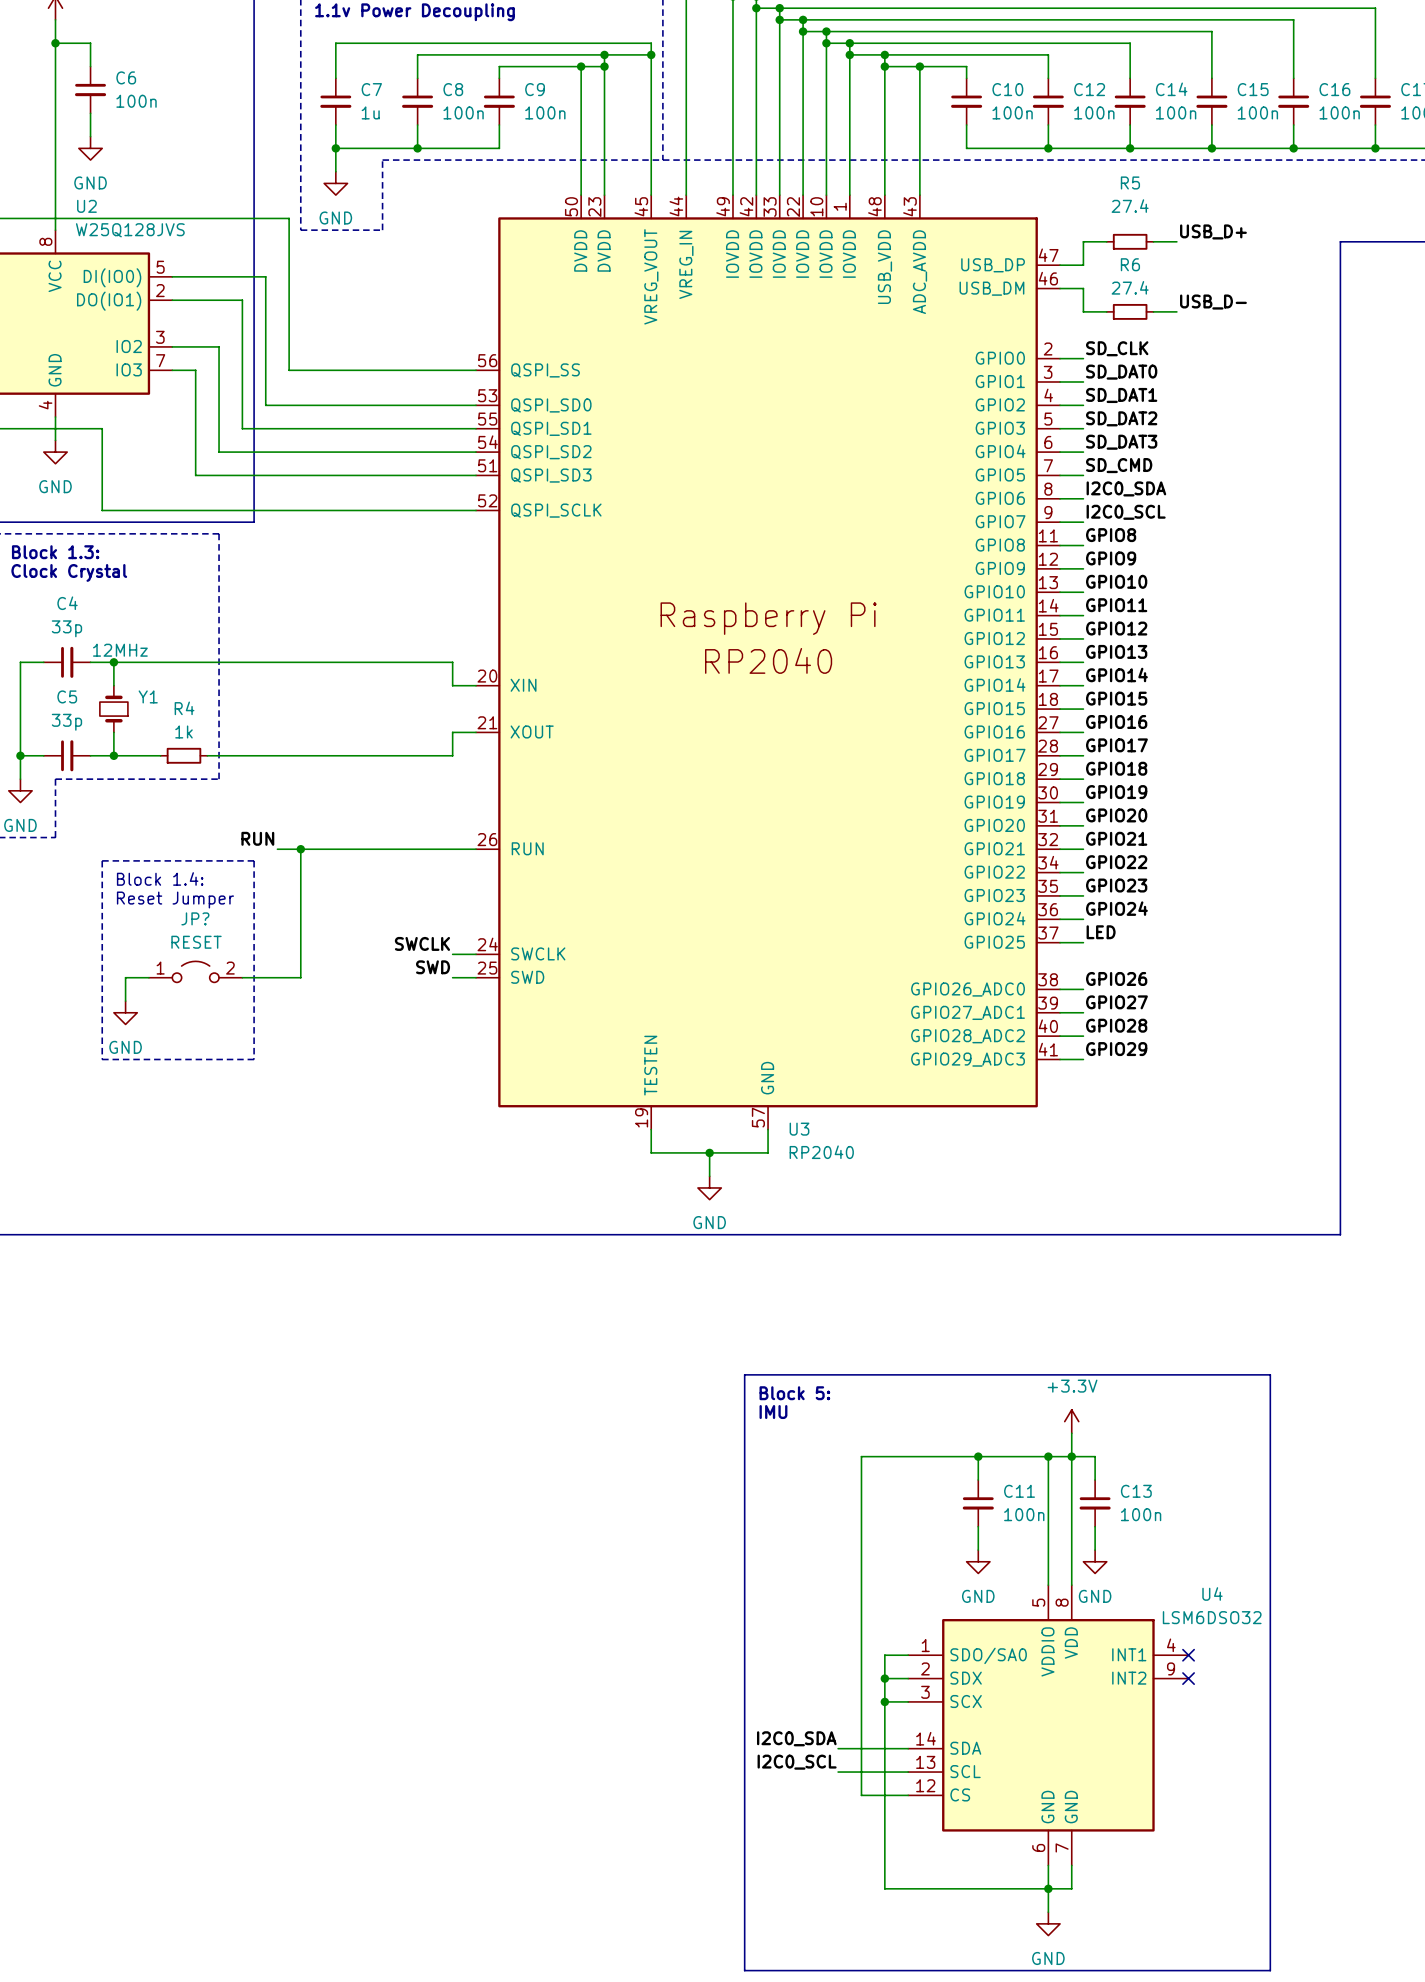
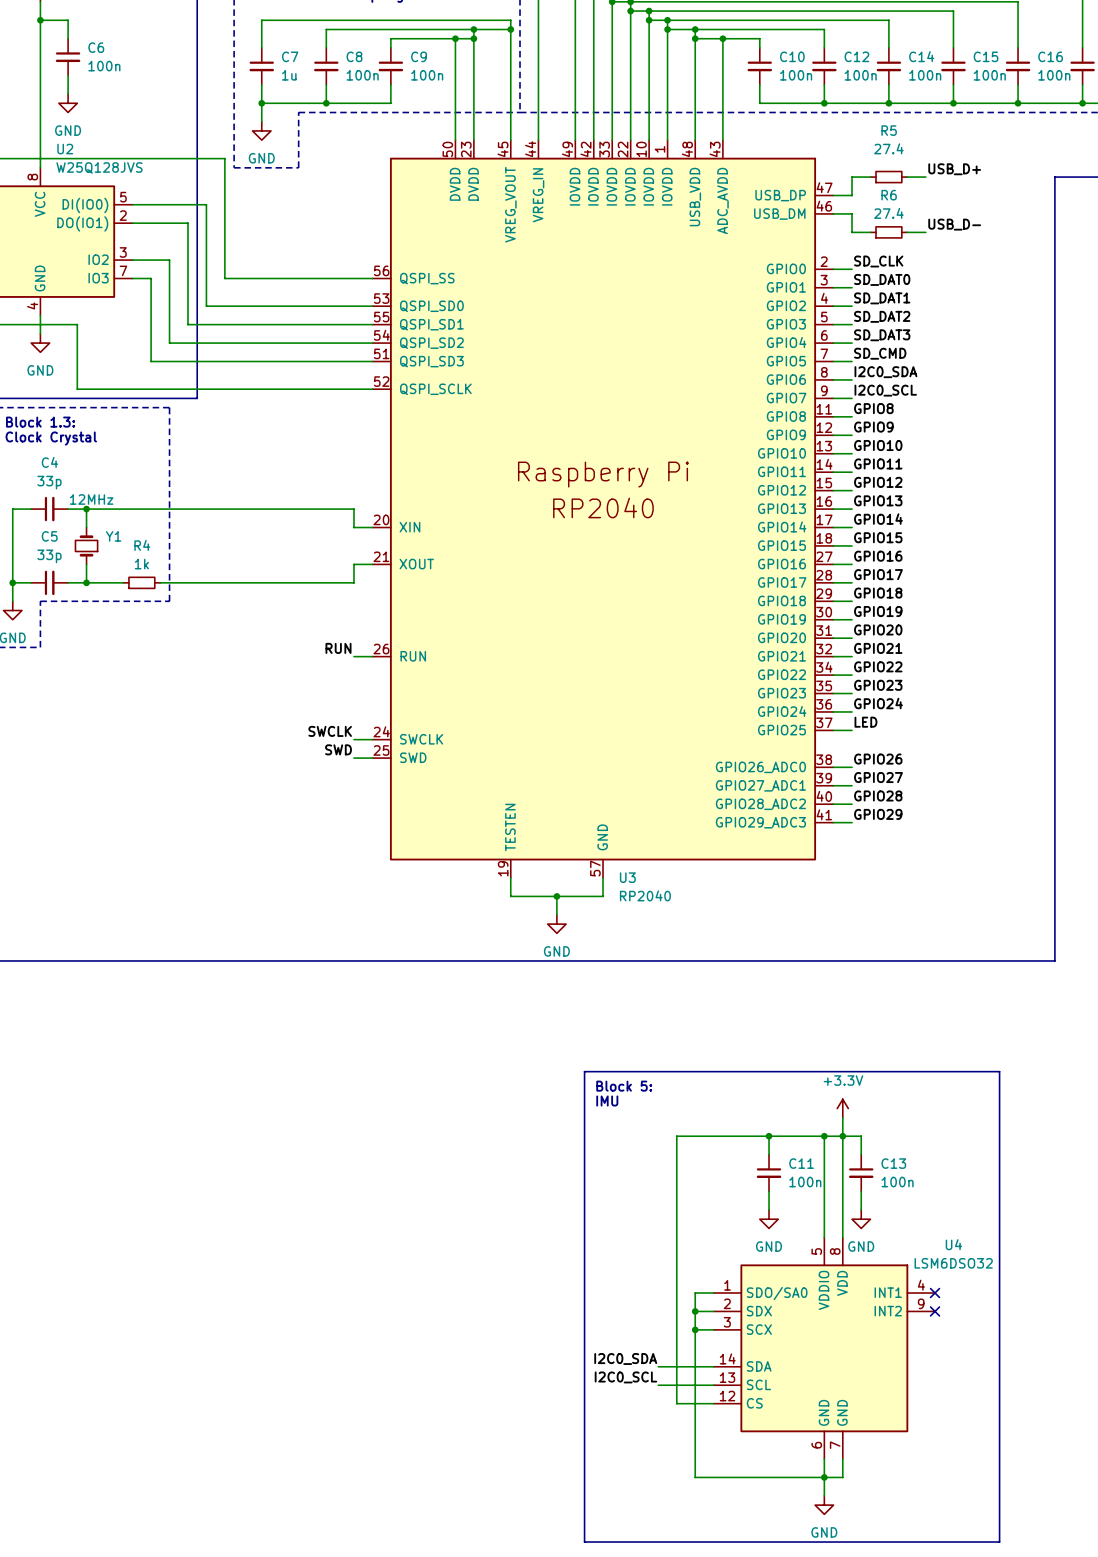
label position: RUN (257, 838) -> RUN (338, 648)
wire: (277, 849) (452, 849) -> none
wire: (300, 849) (300, 977) (242, 977) -> none
junction: (300, 849) -> none
line: (102, 860) (254, 860) (254, 1059) (102, 1059) (102, 860) -> none
text: Block 1.4: (160, 878) -> none
text: Reset Jumper (175, 900) -> none
JP?: RESET (195, 971) -> none
wire: (148, 977) (125, 977) (125, 1001) -> none
power symbol: GND (125, 1012) -> none

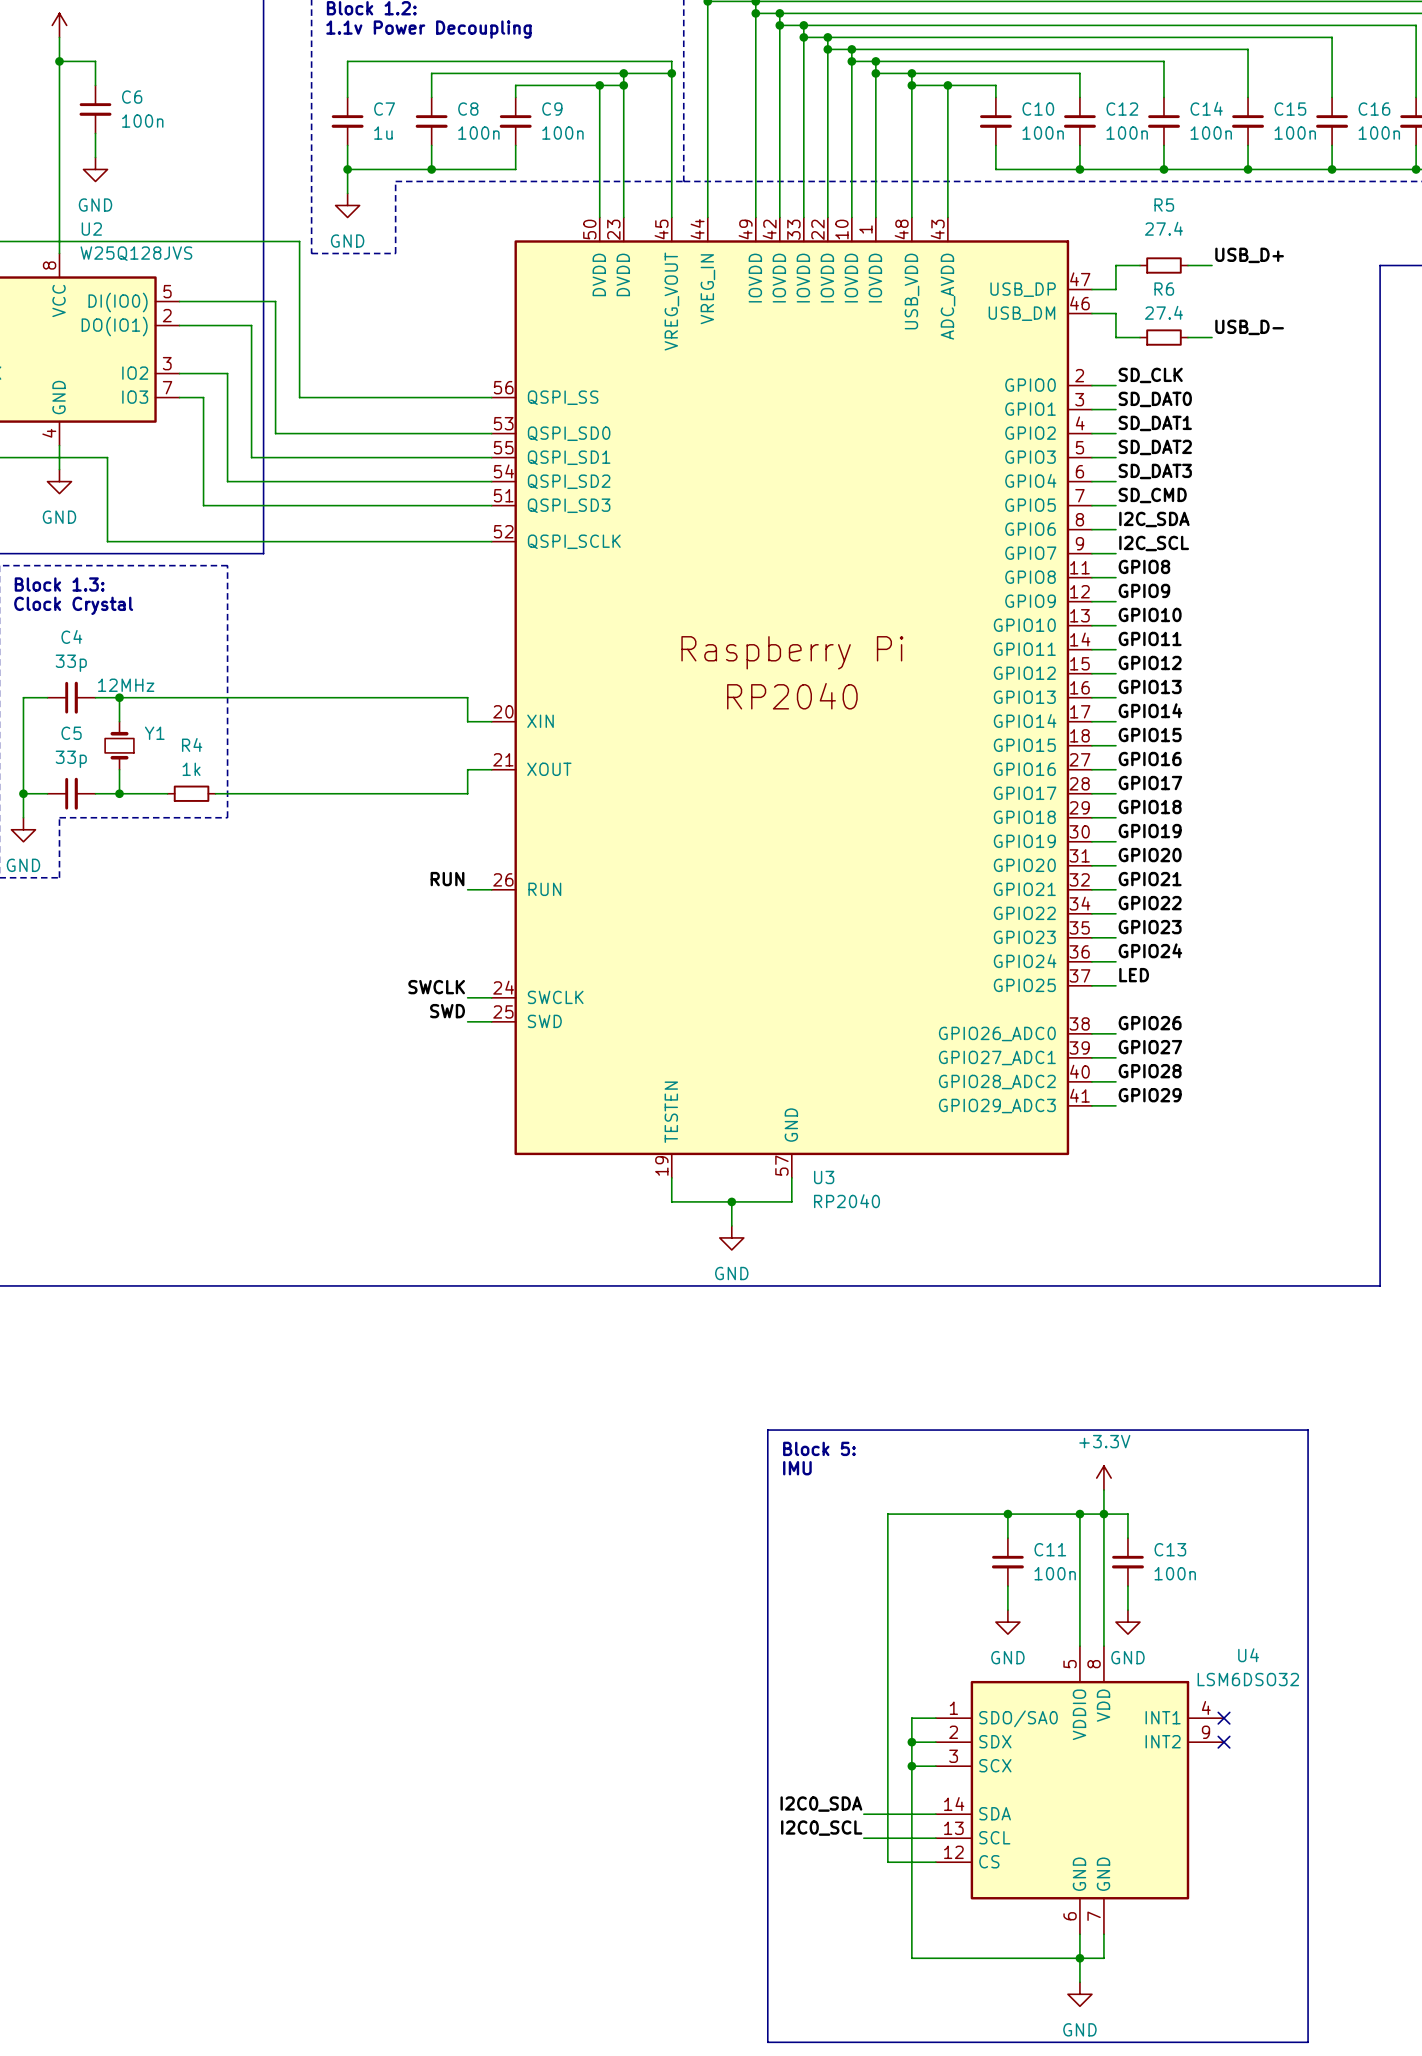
label: I2C0_SDA (885, 372) -> I2C_SDA (1154, 519)
label: I2C0_SCL (885, 390) -> I2C_SCL (1154, 543)

